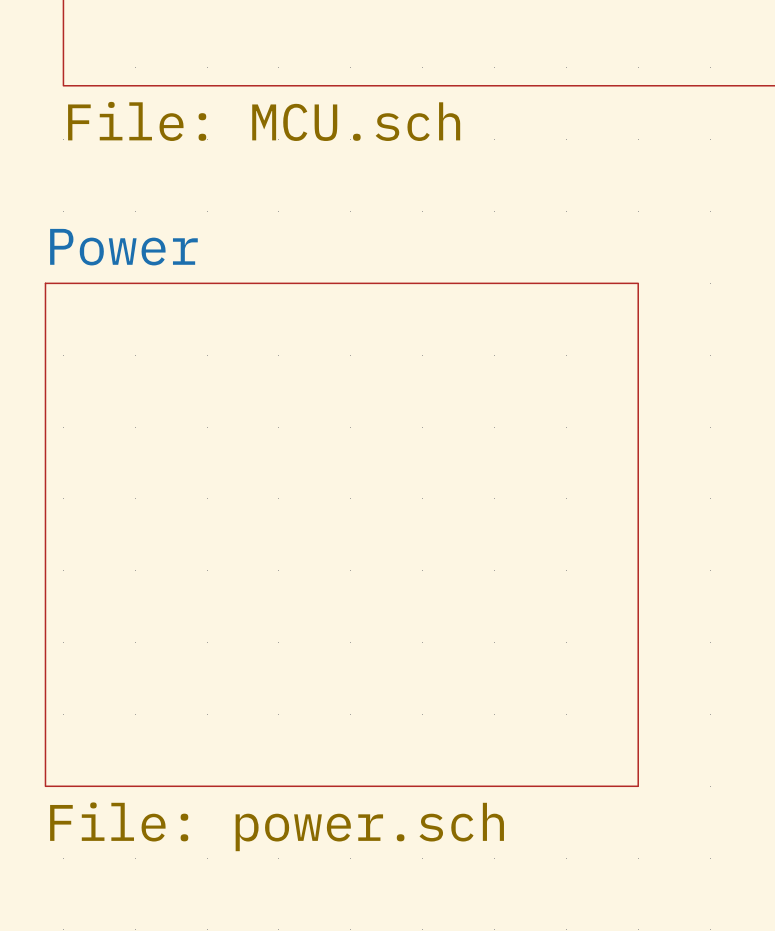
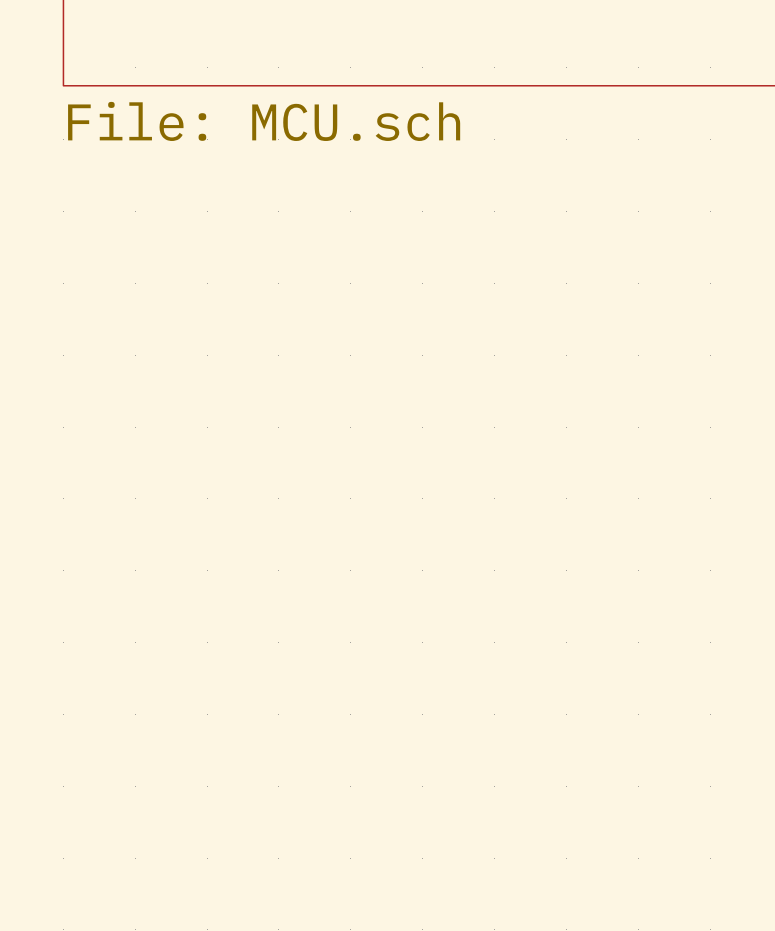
sheet Power: File: power.sch (341, 534) -> none

